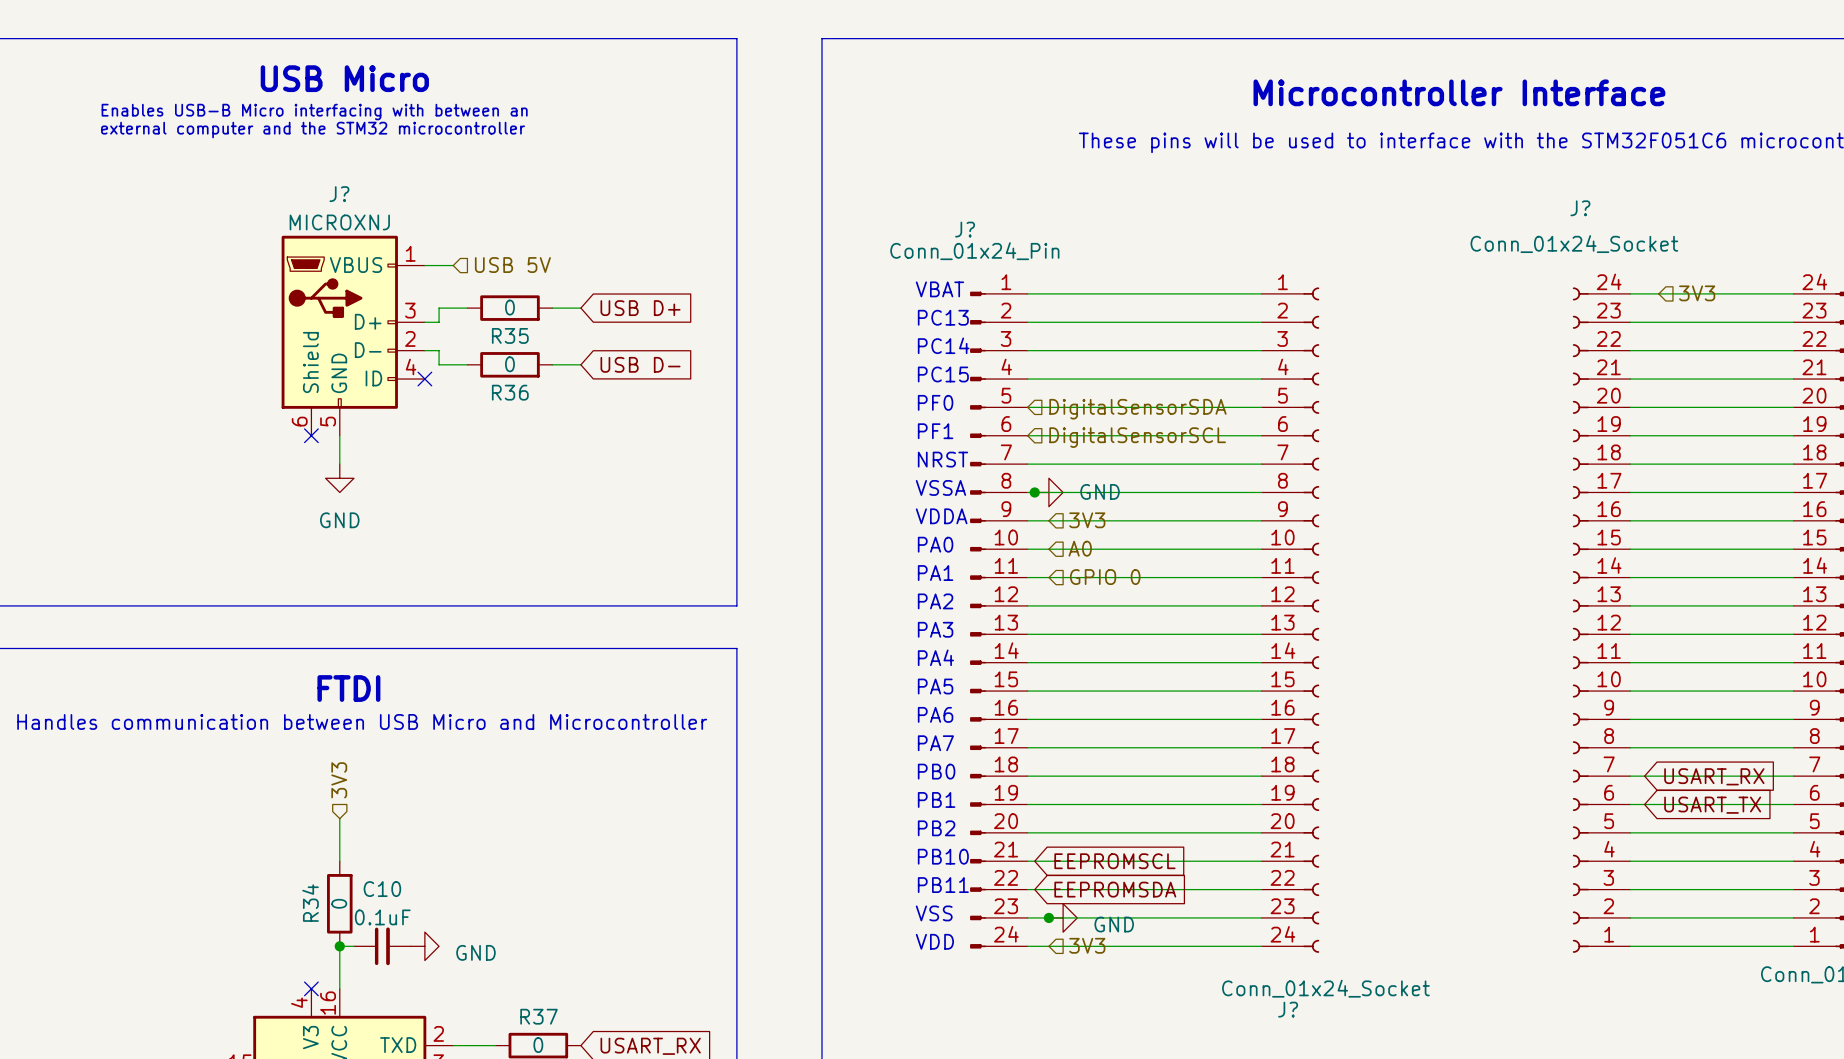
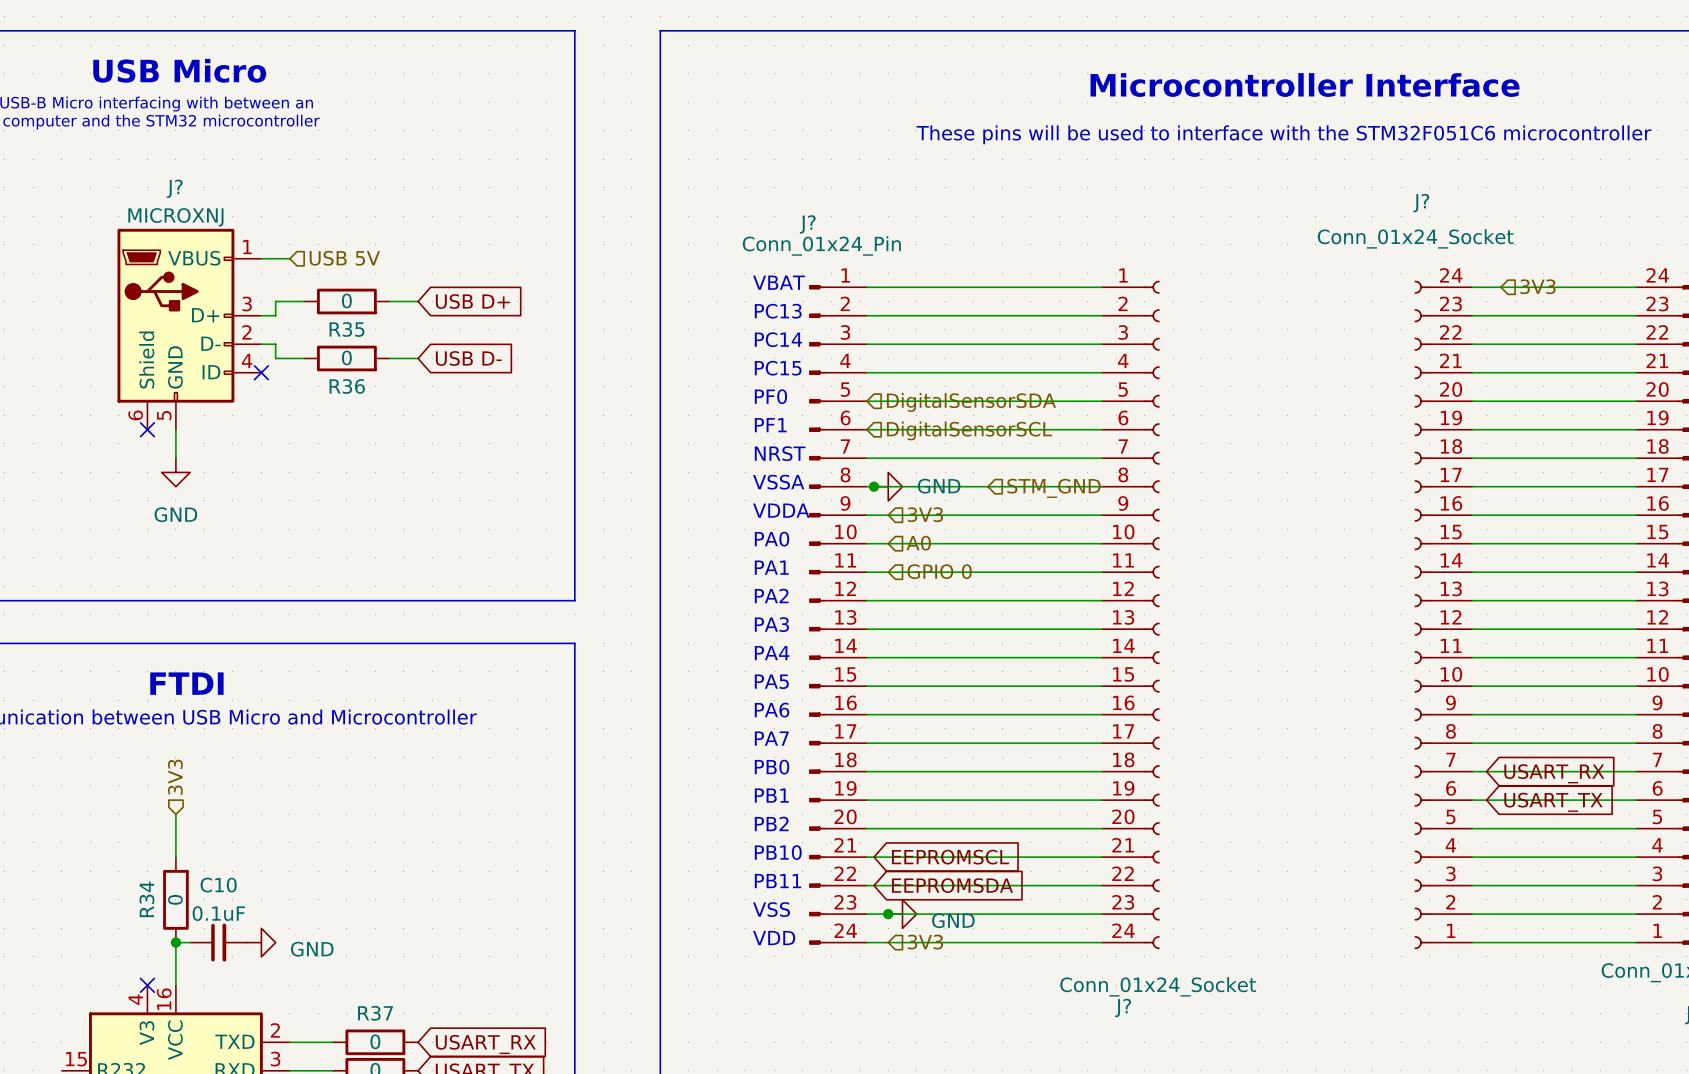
hierarchical label: none -> STM_GND (1054, 488)

